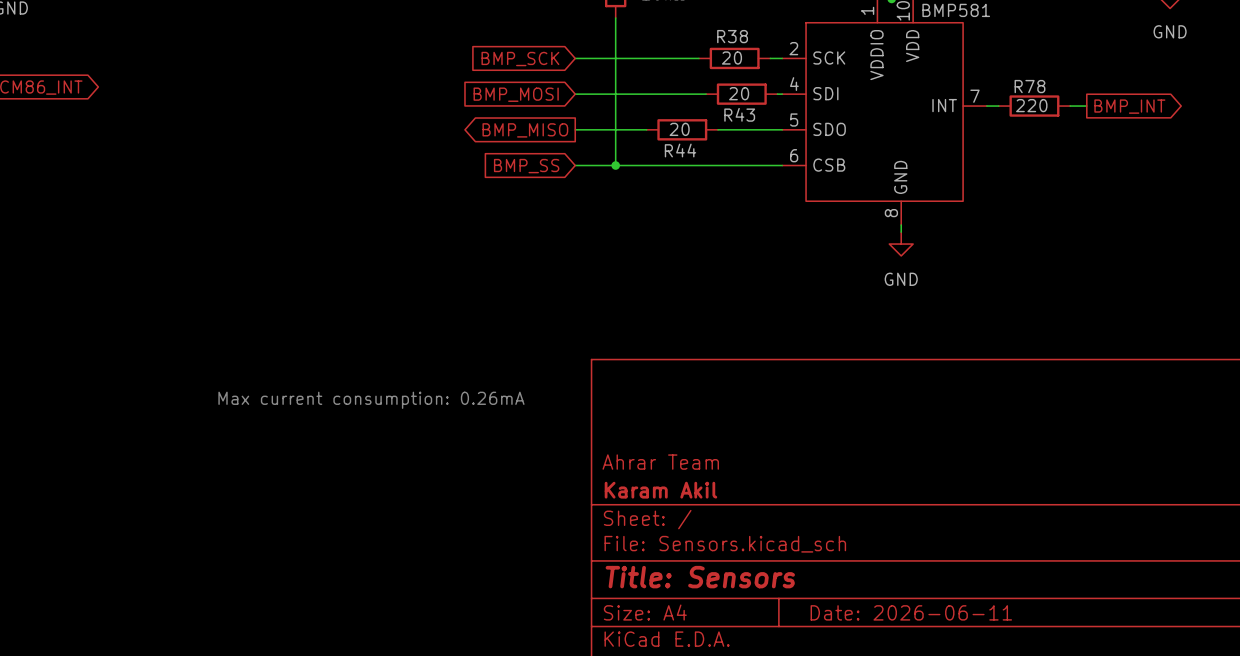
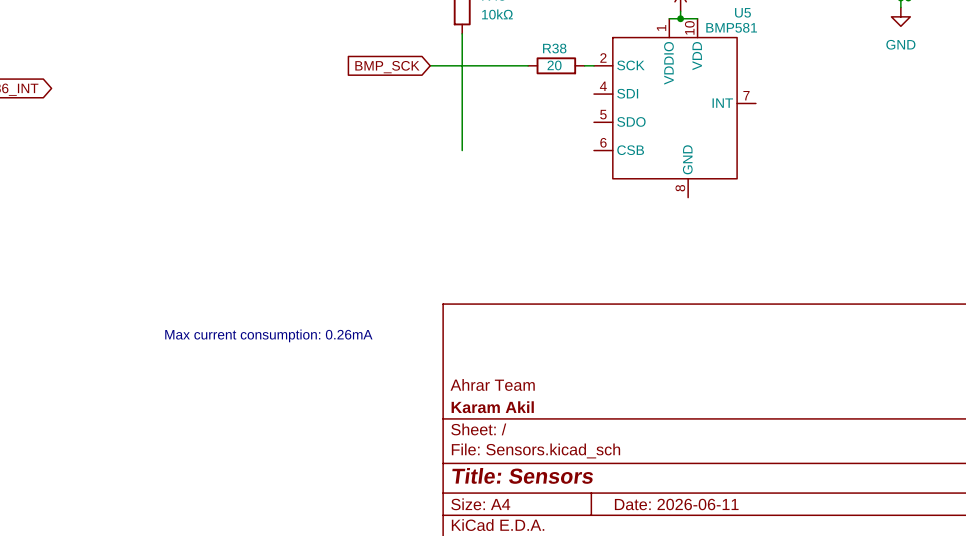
global label: BMP_MOSI (516, 94) -> none
wire: (575, 94) (706, 94) -> none
R43: 20 (741, 94) -> none
wire: (777, 94) (782, 94) -> none
wire: (986, 106) (998, 106) -> none
R78: 220 (1034, 106) -> none
wire: (1070, 106) (1086, 106) -> none
global label: BMP_INT (1129, 106) -> none
wire: (575, 129) (646, 129) -> none
R44: 20 (682, 129) -> none
wire: (718, 129) (782, 129) -> none
global label: BMP_MISO (525, 130) -> none
wire: (575, 165) (782, 165) -> none
junction: (615, 165) -> none
global label: BMP_SS (526, 166) -> none
wire: (901, 225) (901, 232) -> none
power symbol: GND (901, 244) -> none

